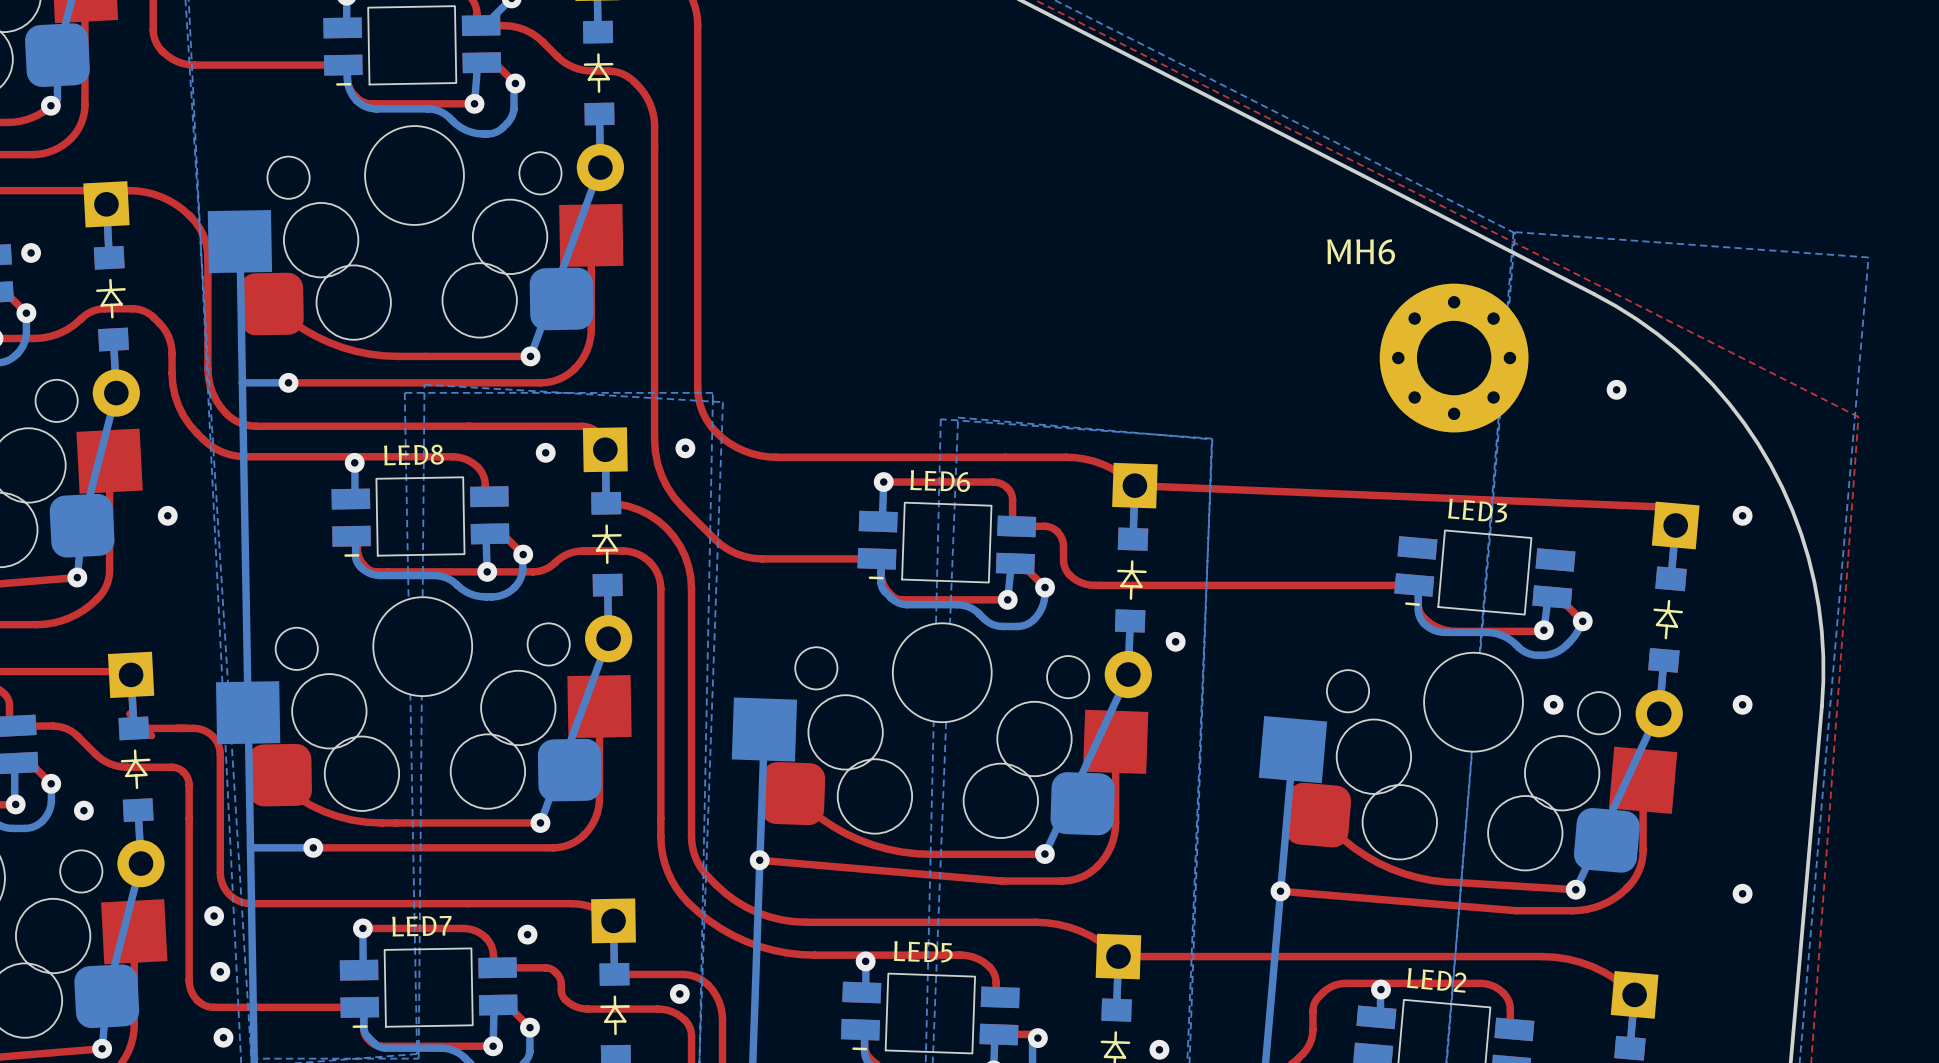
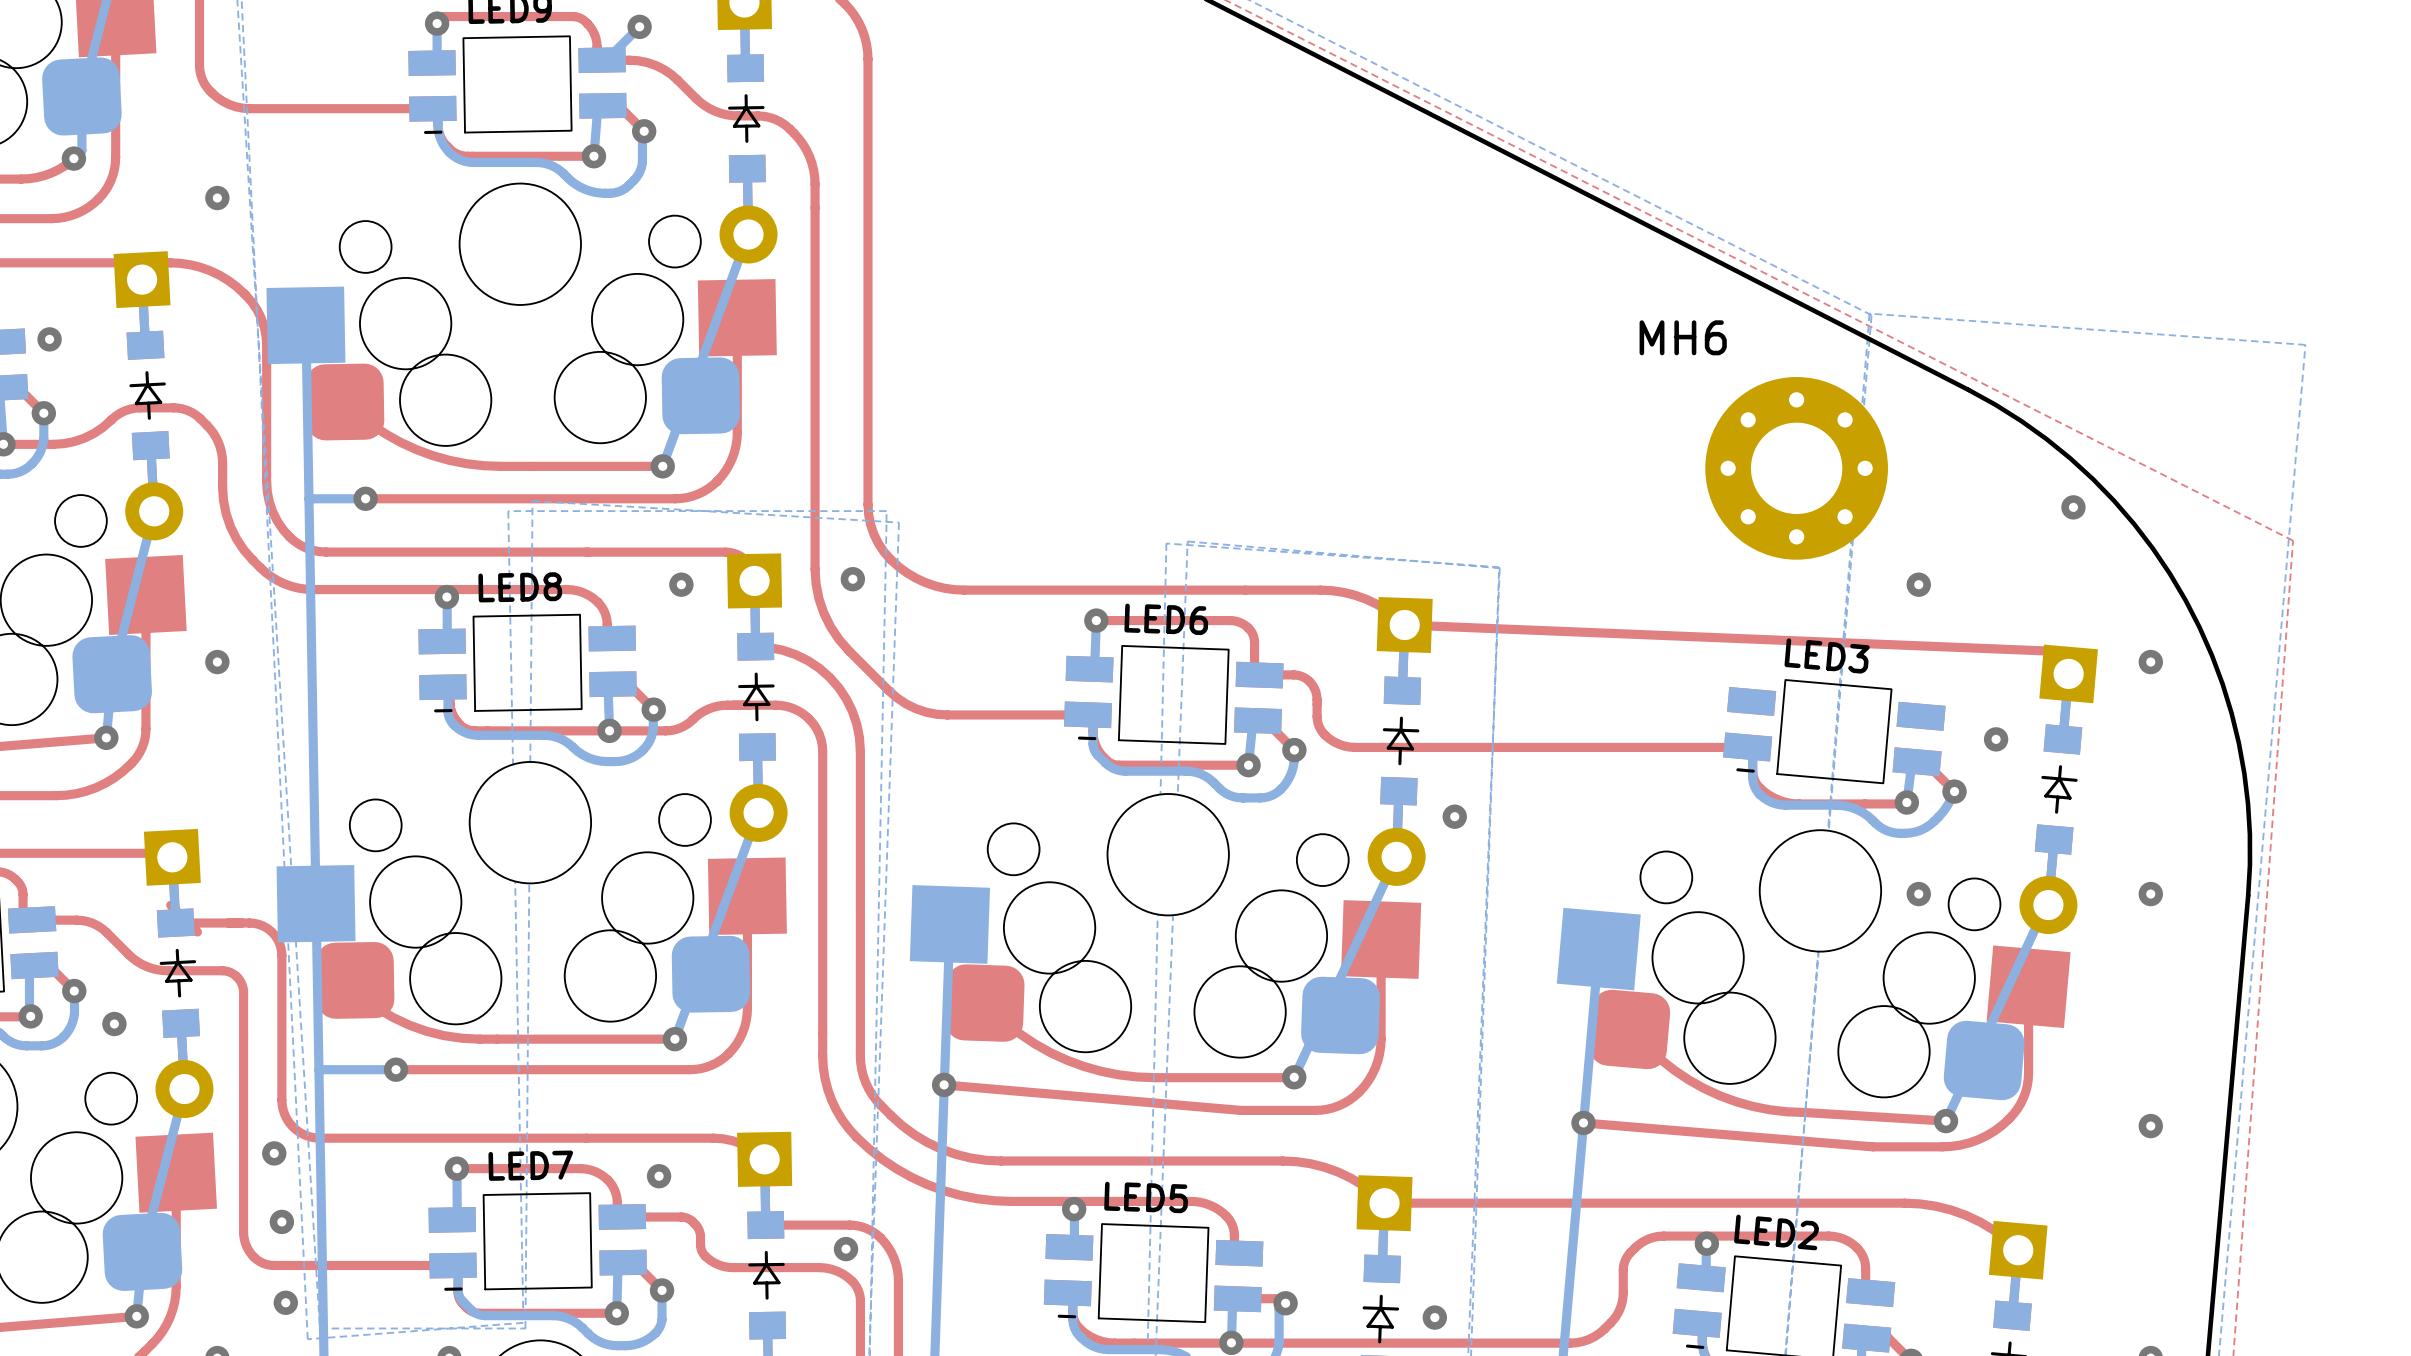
via: none -> (217, 198)
via: (1616, 389) -> none
via: none -> (2073, 507)
via: none -> (1918, 584)
via: none -> (1996, 739)

